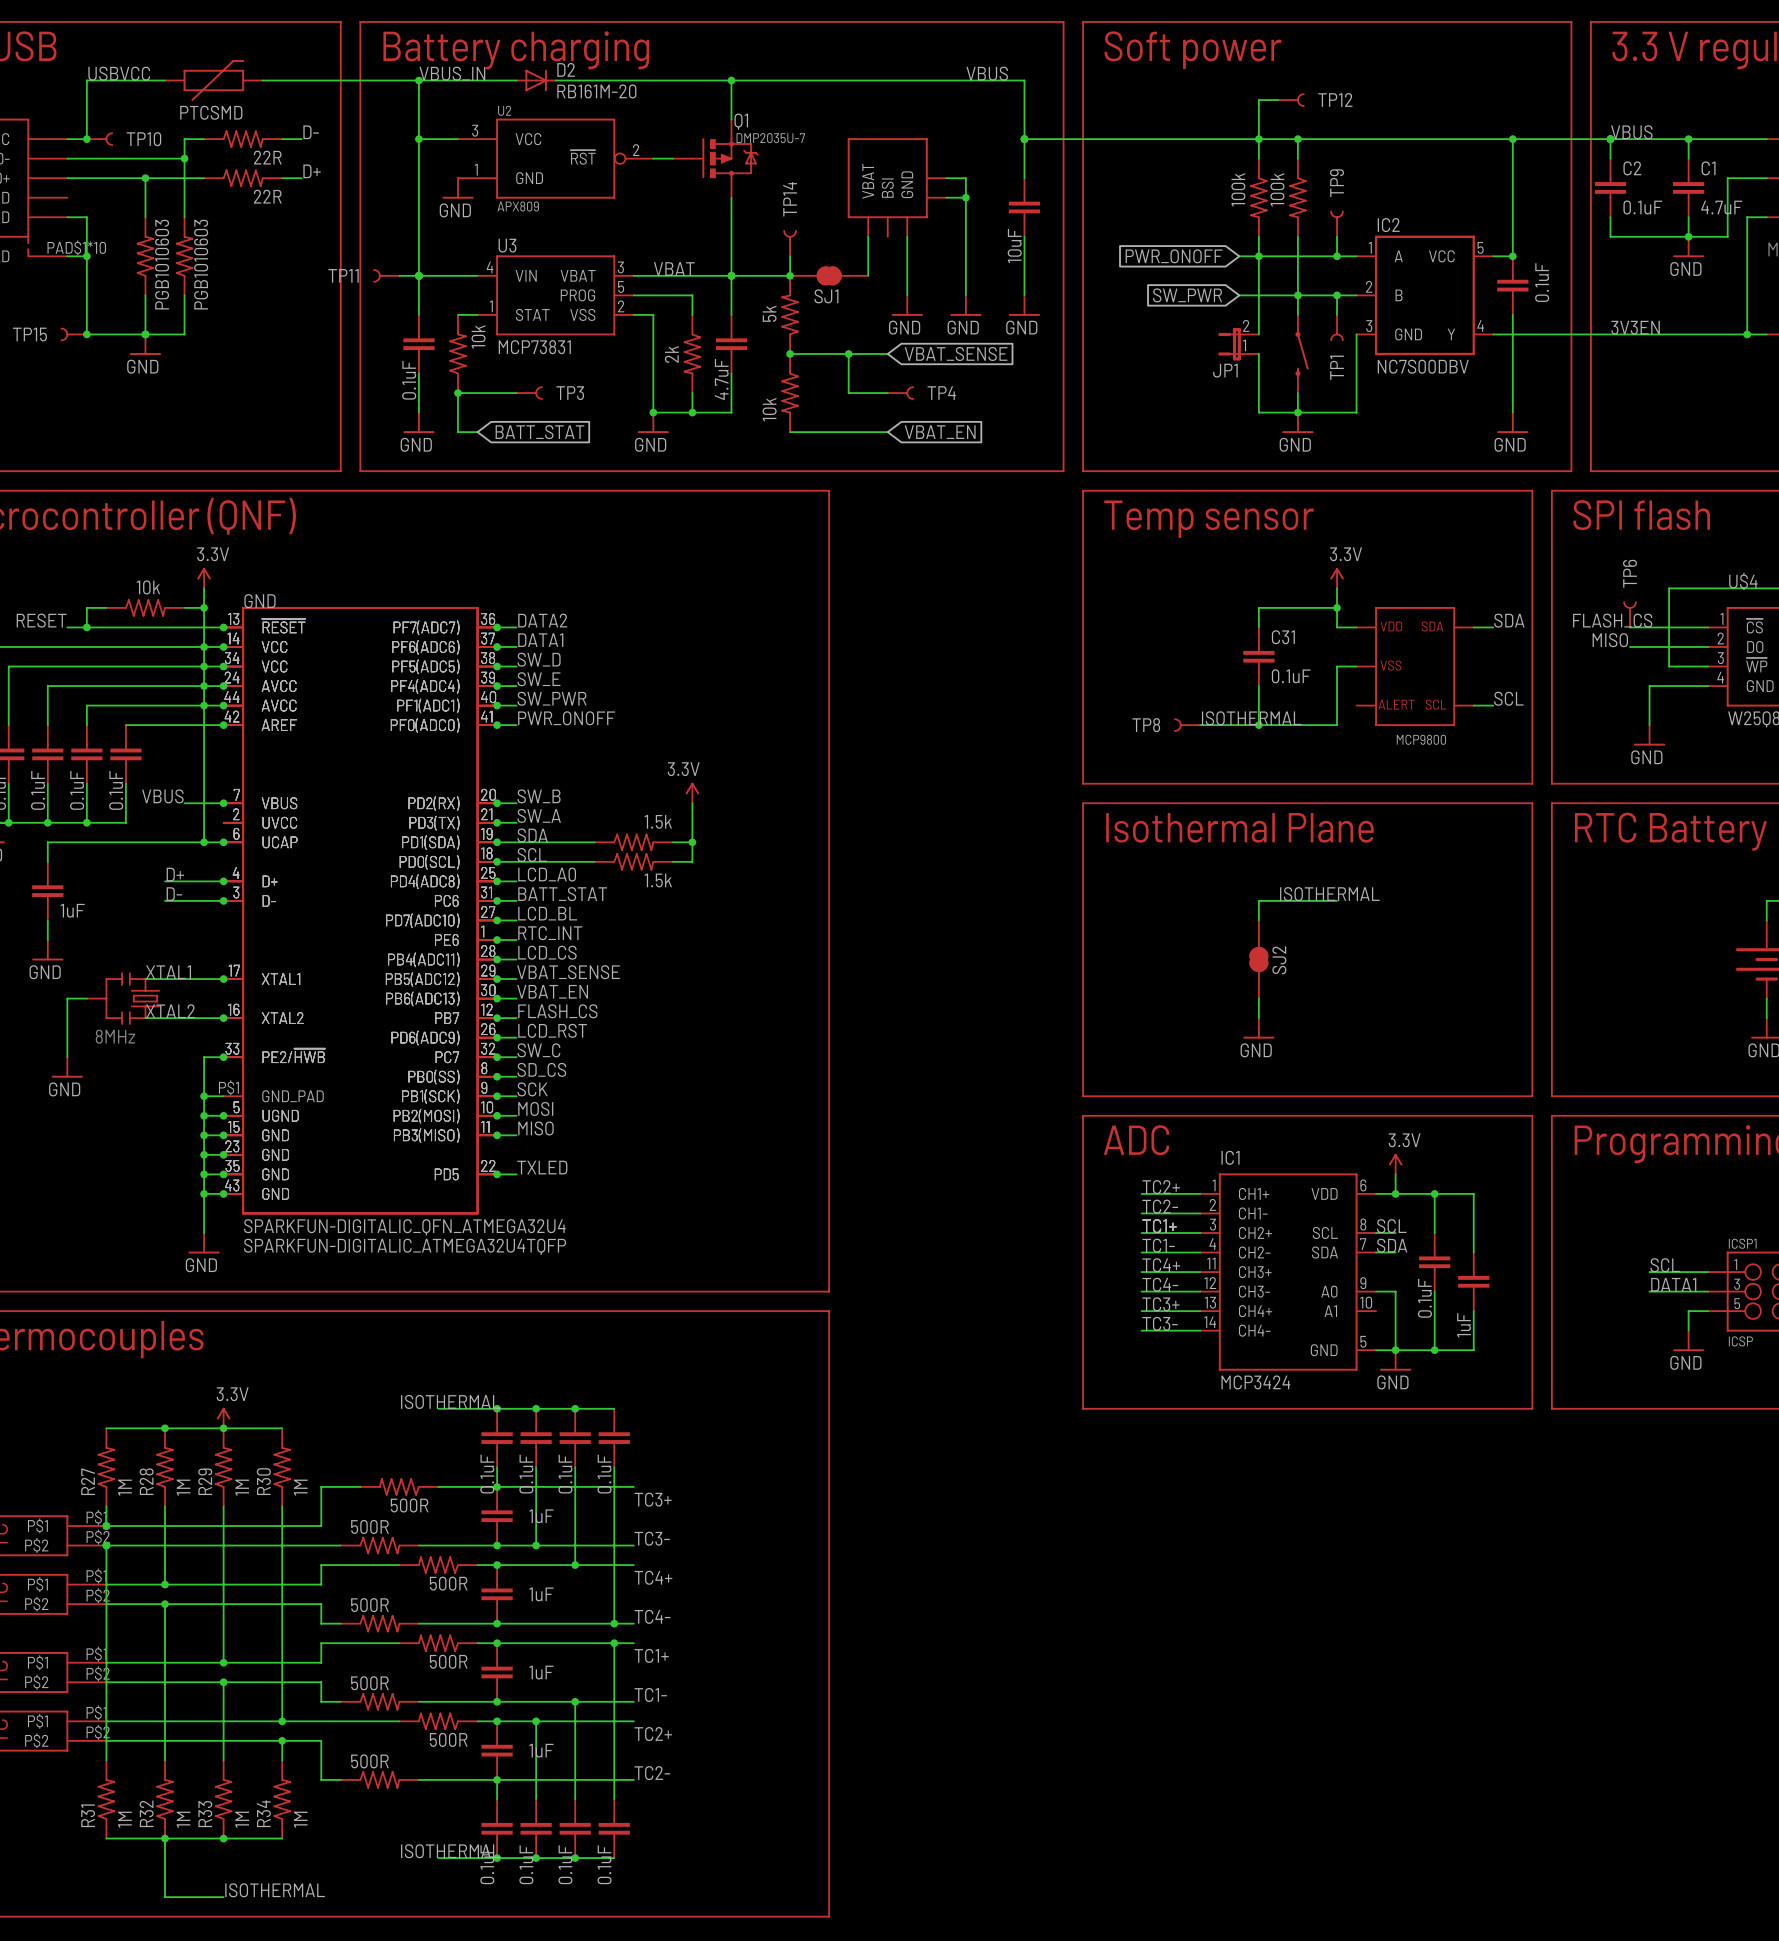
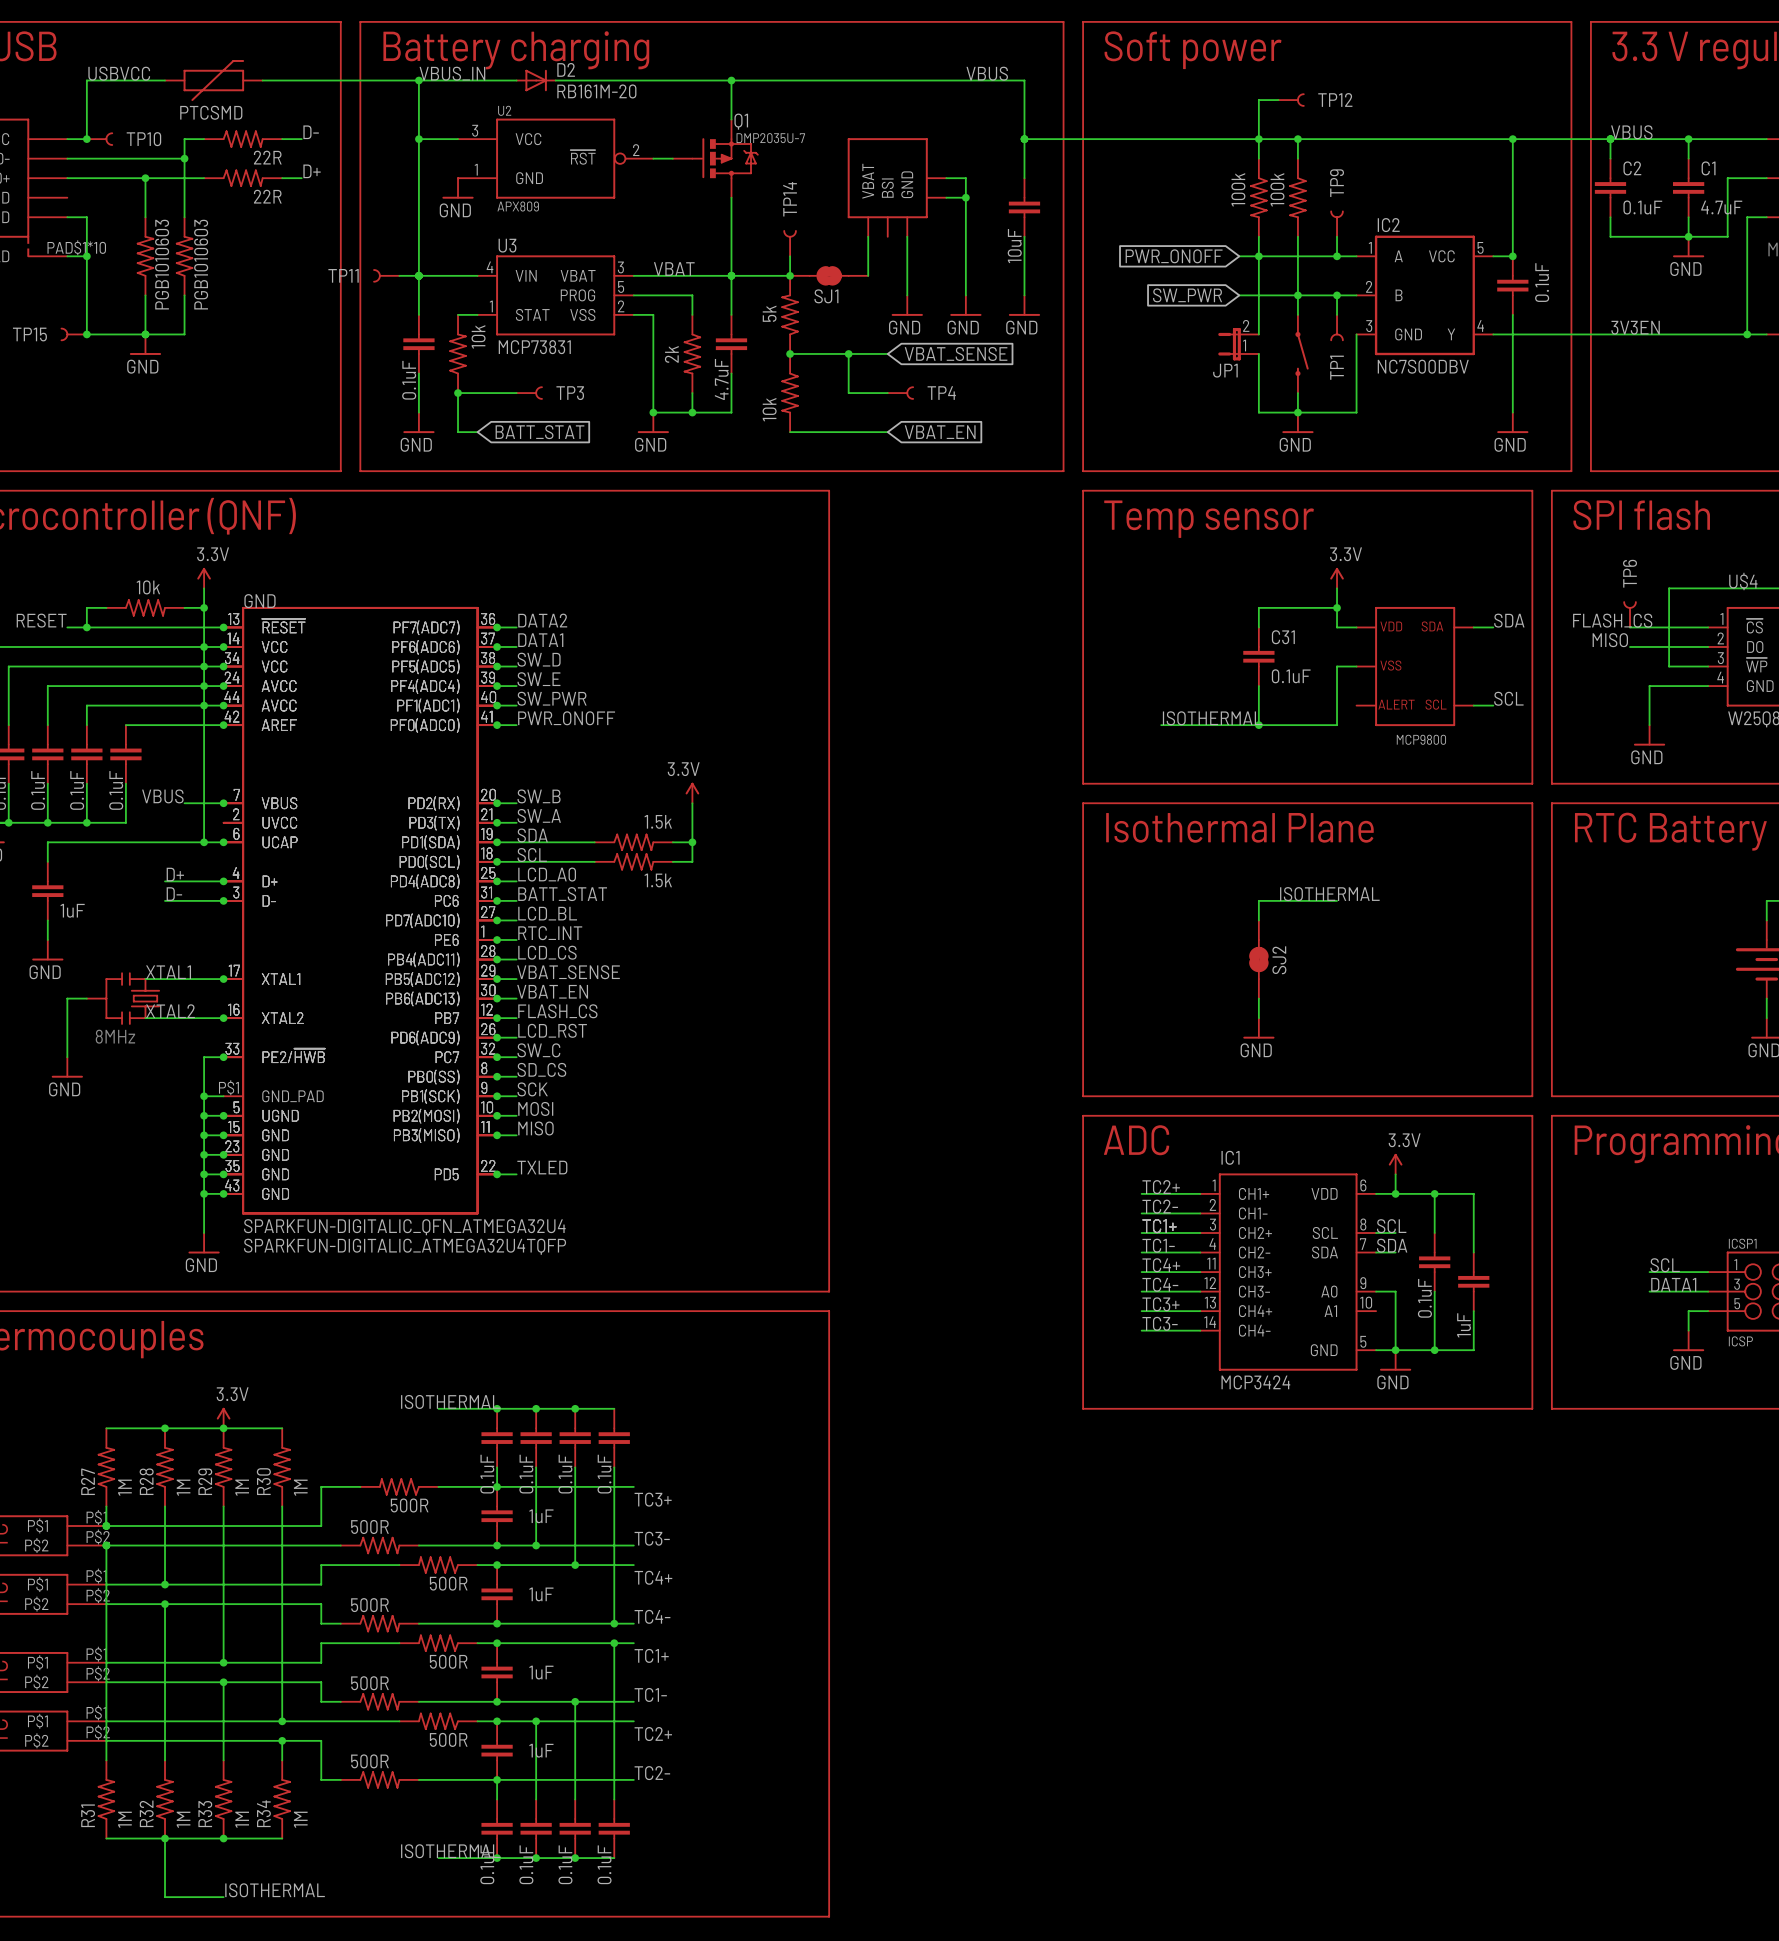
label position: ISOTHERMAL (1251, 718) -> ISOTHERMAL (1212, 718)
TP8: (1187, 725) -> none

